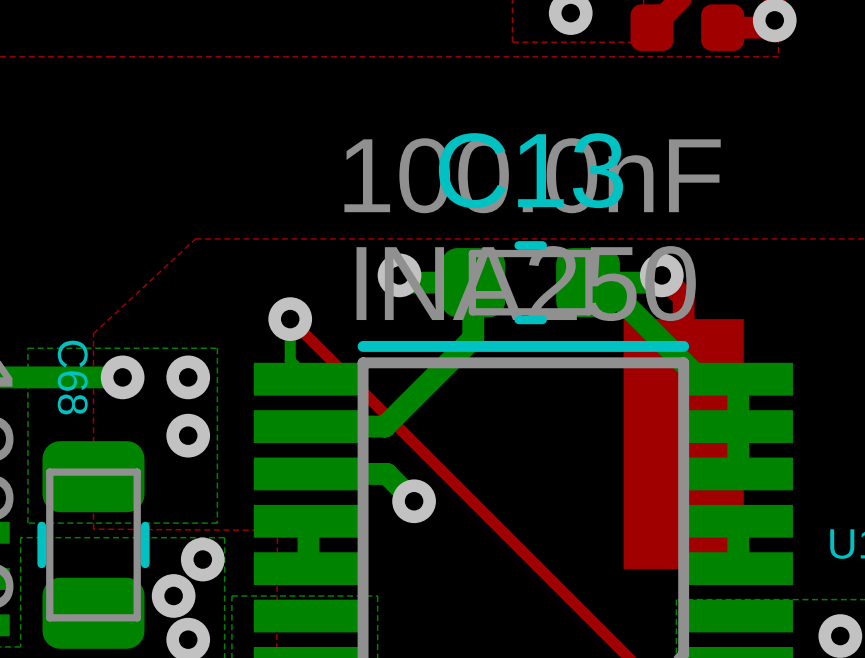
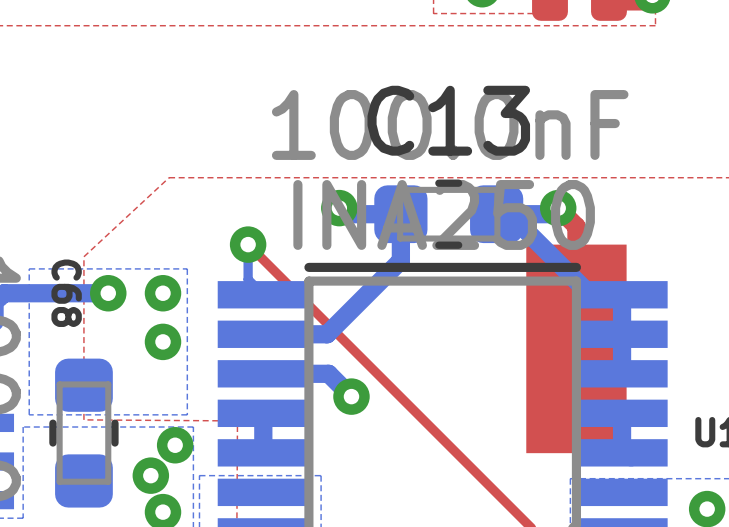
C68 footprint: [37, 441, 150, 649] -> [49, 358, 119, 508]

